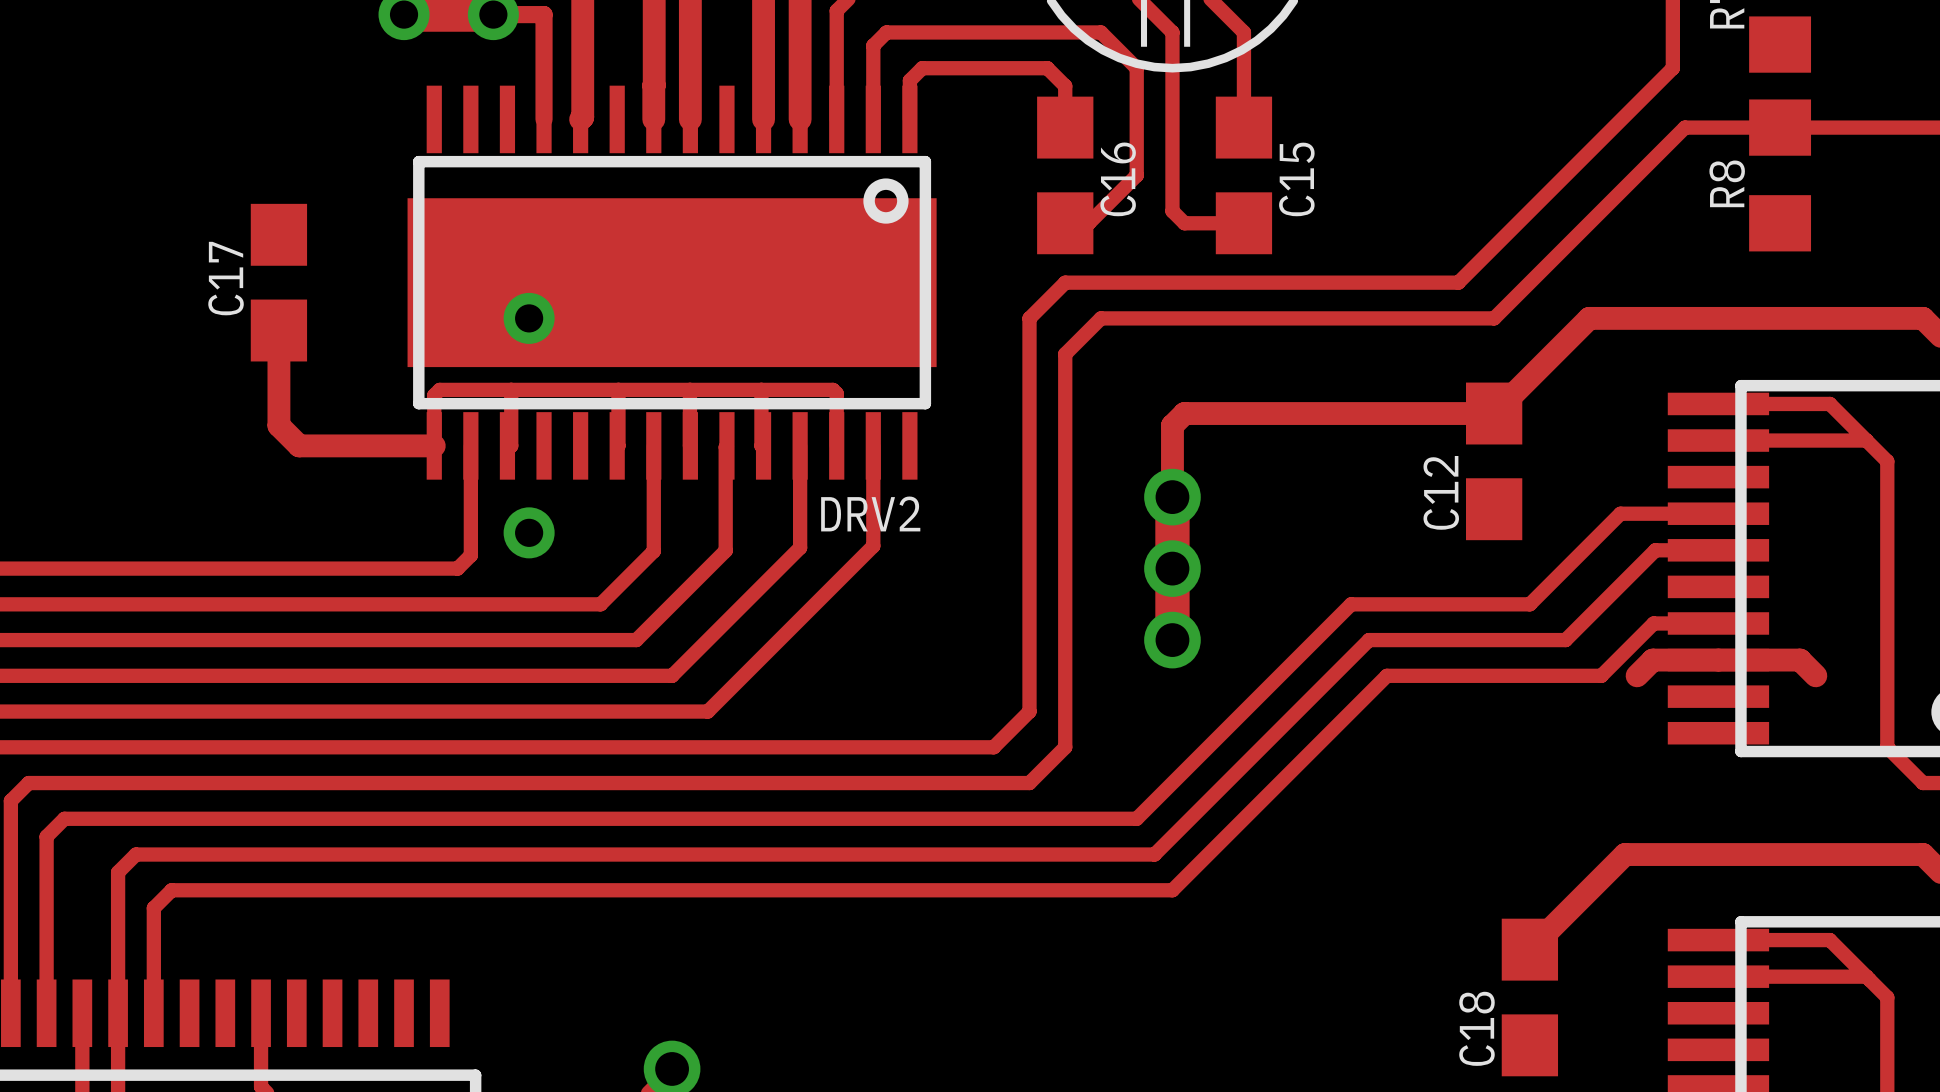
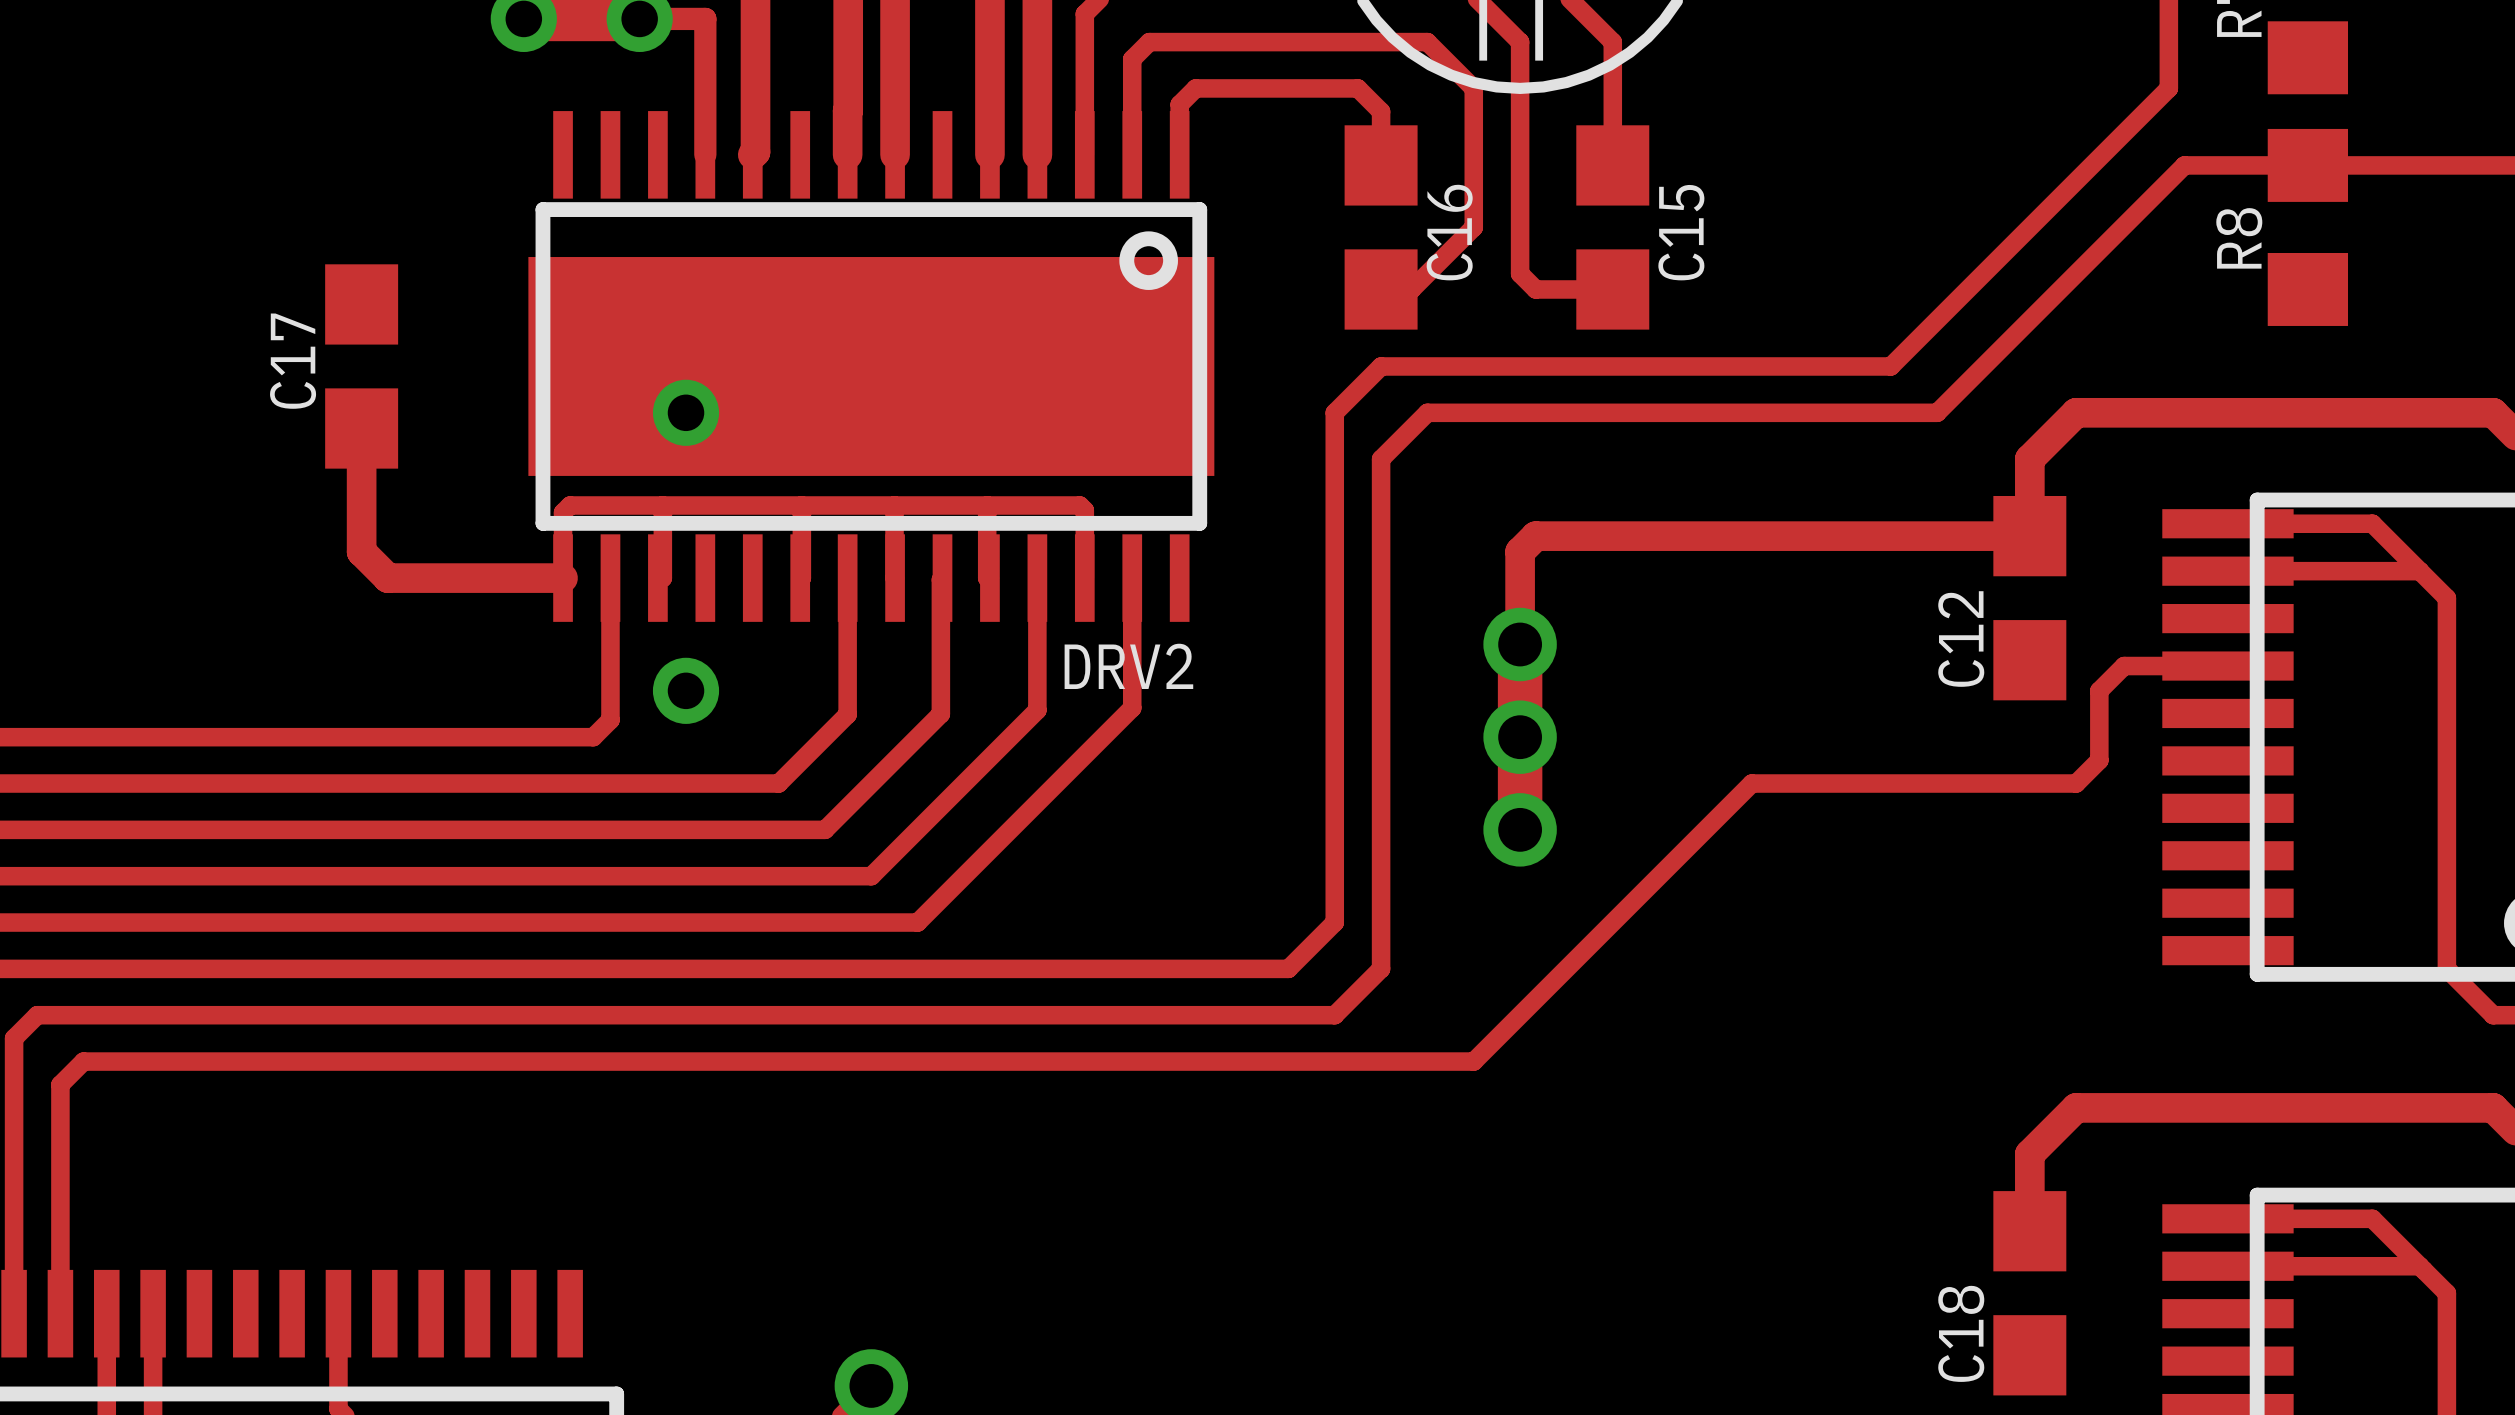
track: (1601, 318) (1589, 318) (1494, 413) -> (2076, 412) (2029, 459) (2029, 536) (1937, 536)
C12 position: (1494, 461) -> (2029, 598)
track: (1638, 513) (1620, 513) (1529, 604) -> (2076, 783) (1983, 783)
track: (1718, 550) (1655, 550) (1619, 586) -> (2124, 666) (2099, 690) (2099, 760)
track: (1601, 604) (1565, 640) (1369, 640) (1154, 854) (135, 854) (118, 872) (118, 1013) -> none
track: (1718, 623) (1653, 623) (1601, 675) (1386, 675) (1172, 890) (171, 890) (153, 908) (153, 1013) -> none
track: (1637, 675) (1652, 660) (1800, 660) (1815, 675) -> none
track: (1625, 854) (1529, 949) -> (2106, 1107) (2076, 1107) (2029, 1154) (2029, 1231)
C18 position: (1529, 997) -> (2029, 1293)

